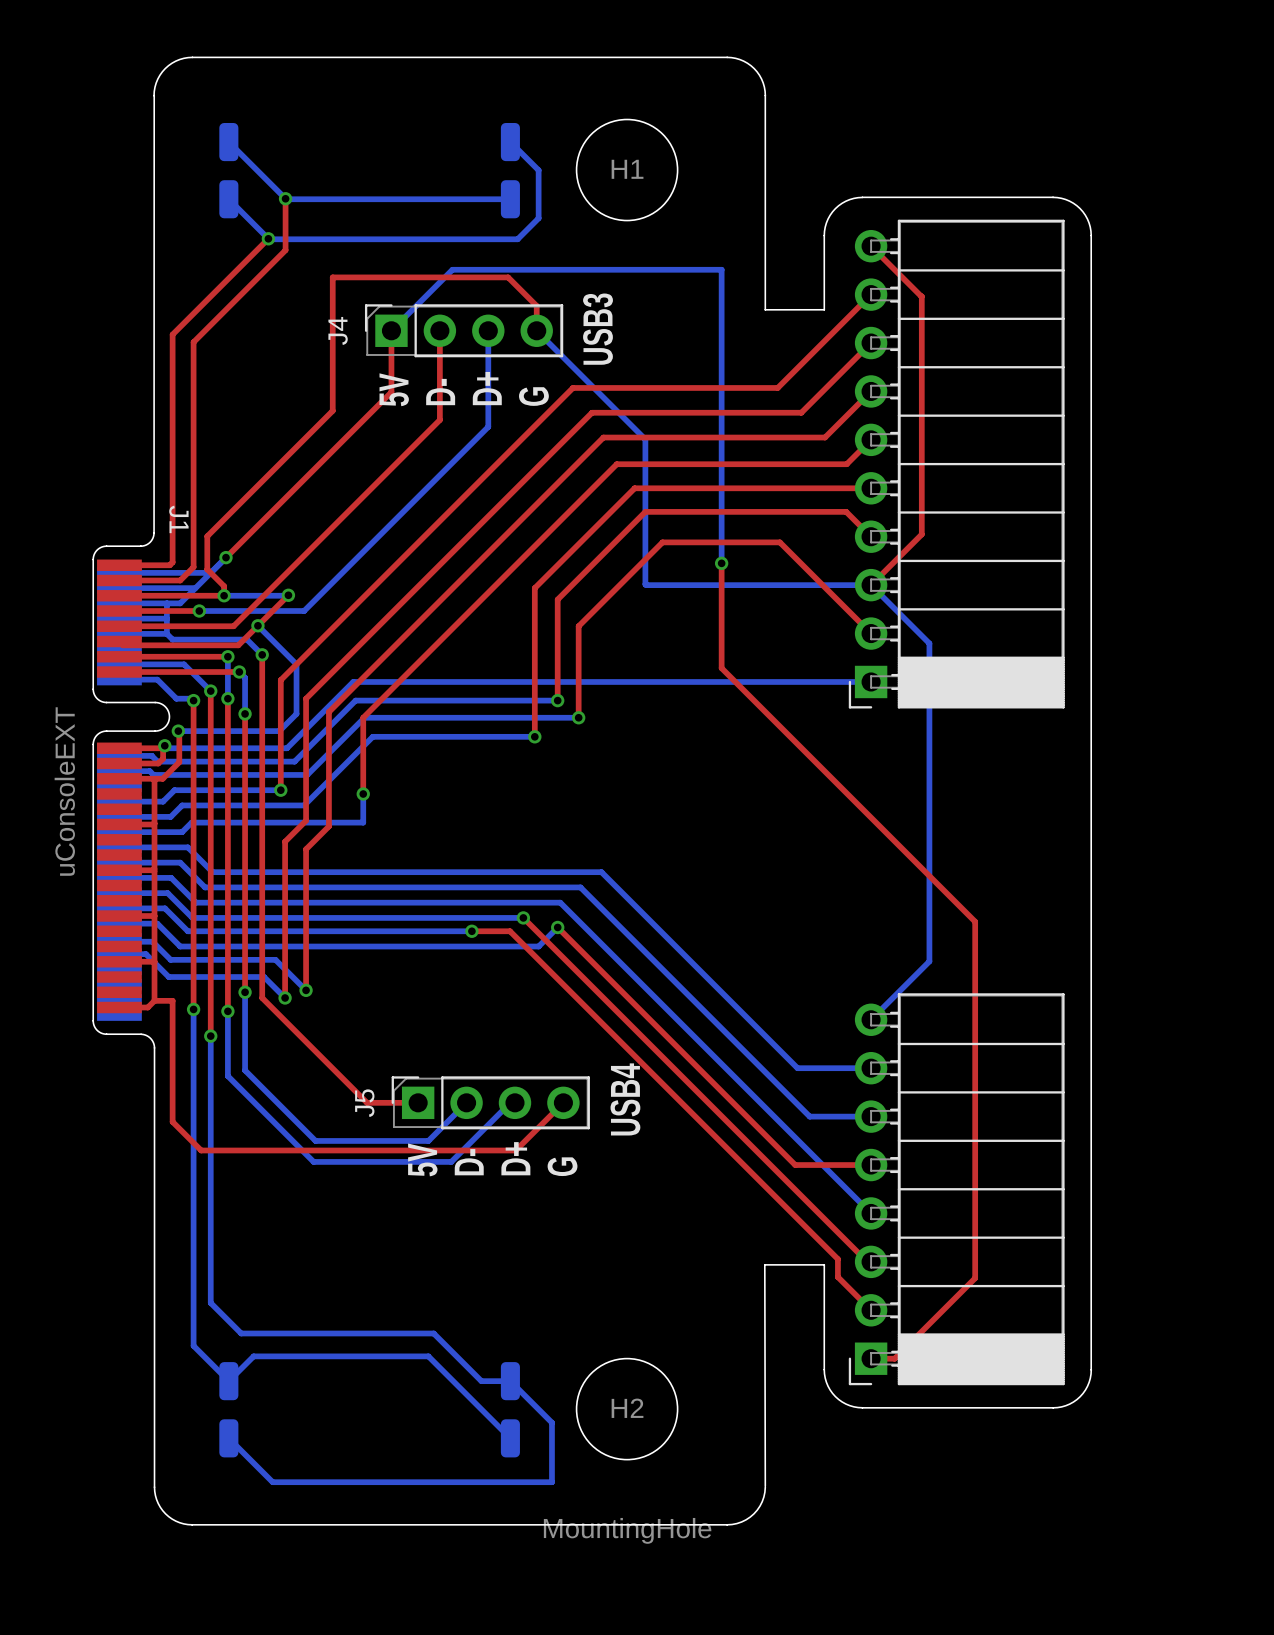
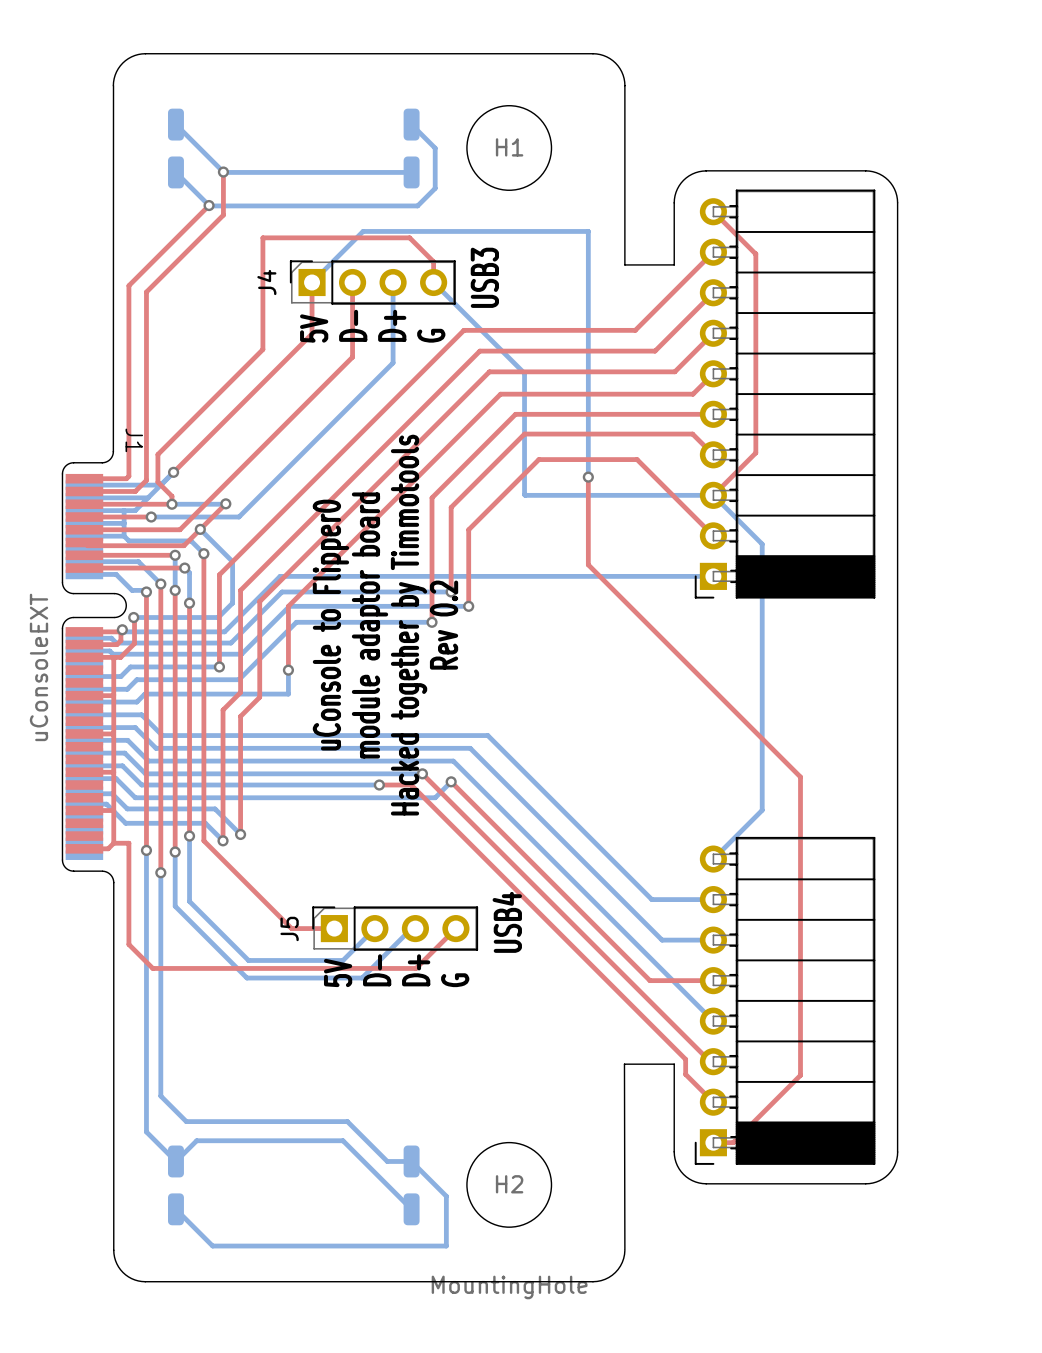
text: none -> uConsole to Flipper0 (330, 625)
text: none -> module adaptor board (370, 625)
text: none -> Hacked together by Timmotools (409, 625)
text: none -> Rev 0.2 (444, 625)

